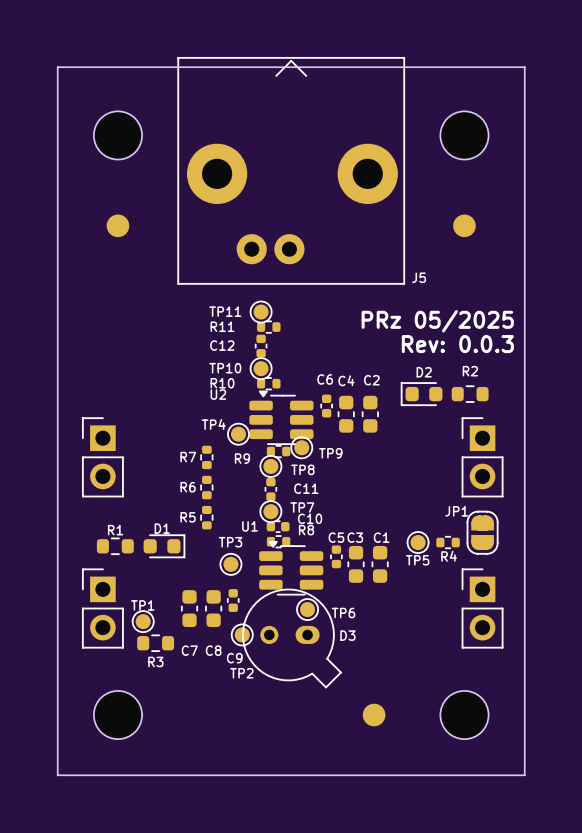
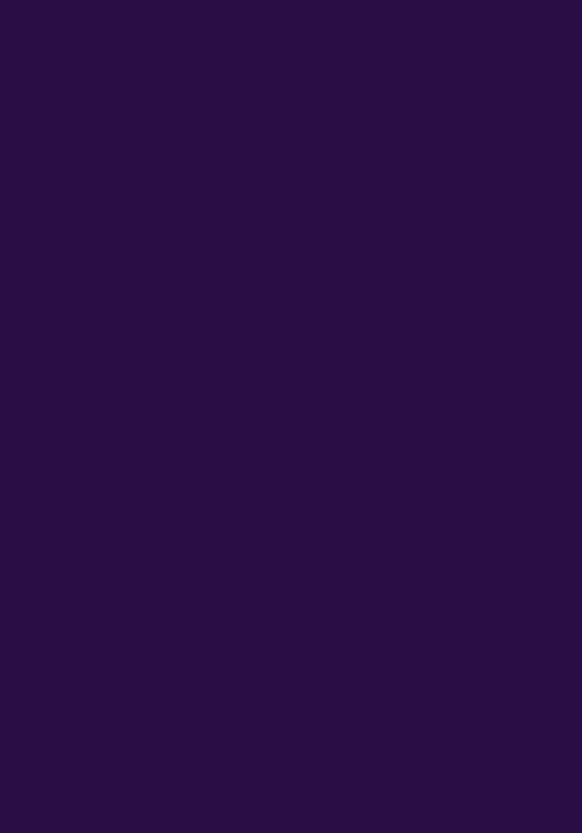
board edge: (57, 67) (524, 67) (524, 775) (57, 775) (57, 67) -> none
part: (117, 135) -> none
part: (464, 135) -> none
J5: (291, 170) -> none
part: (117, 225) -> none
part: (464, 225) -> none
TP11: (261, 312) -> none
text: PRz 05/2025 (437, 321) -> none
R11: (268, 327) -> none
text: Rev: 0.0.3 (457, 344) -> none
C12: (261, 346) -> none
TP10: (261, 368) -> none
R10: (268, 383) -> none
D2: (421, 394) -> none
R2: (470, 394) -> none
C6: (326, 406) -> none
C4: (346, 414) -> none
C2: (370, 414) -> none
U2: (281, 417) -> none
TP4: (238, 434) -> none
TP9: (301, 447) -> none
R9: (278, 451) -> none
part: (102, 457) -> none
R7: (206, 457) -> none
part: (482, 457) -> none
TP8: (270, 466) -> none
R6: (206, 487) -> none
C11: (270, 489) -> none
TP7: (270, 511) -> none
R5: (206, 517) -> none
C10: (278, 526) -> none
JP1: (482, 532) -> none
R8: (278, 541) -> none
TP5: (418, 542) -> none
R4: (448, 542) -> none
R1: (115, 546) -> none
D1: (164, 546) -> none
C5: (336, 556) -> none
TP3: (230, 564) -> none
C3: (356, 564) -> none
C1: (380, 564) -> none
U1: (291, 568) -> none
C9: (233, 600) -> none
part: (102, 608) -> none
C7: (189, 608) -> none
C8: (213, 608) -> none
part: (482, 608) -> none
TP6: (307, 609) -> none
TP1: (143, 621) -> none
TP2: (242, 634) -> none
D3: (291, 638) -> none
R3: (155, 643) -> none
part: (117, 715) -> none
part: (374, 715) -> none
part: (464, 715) -> none

